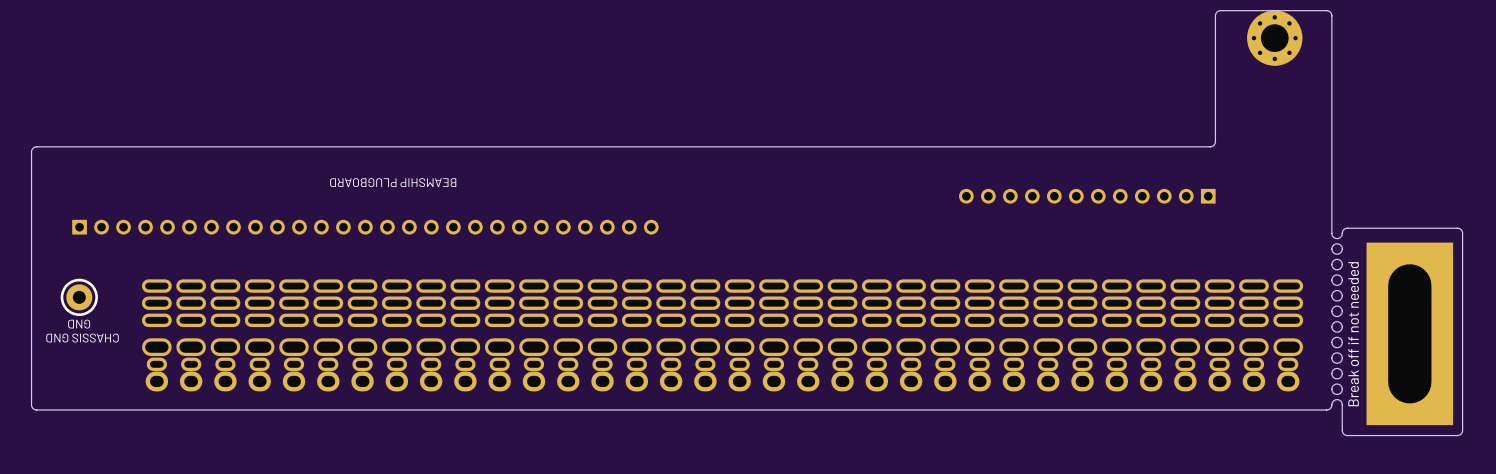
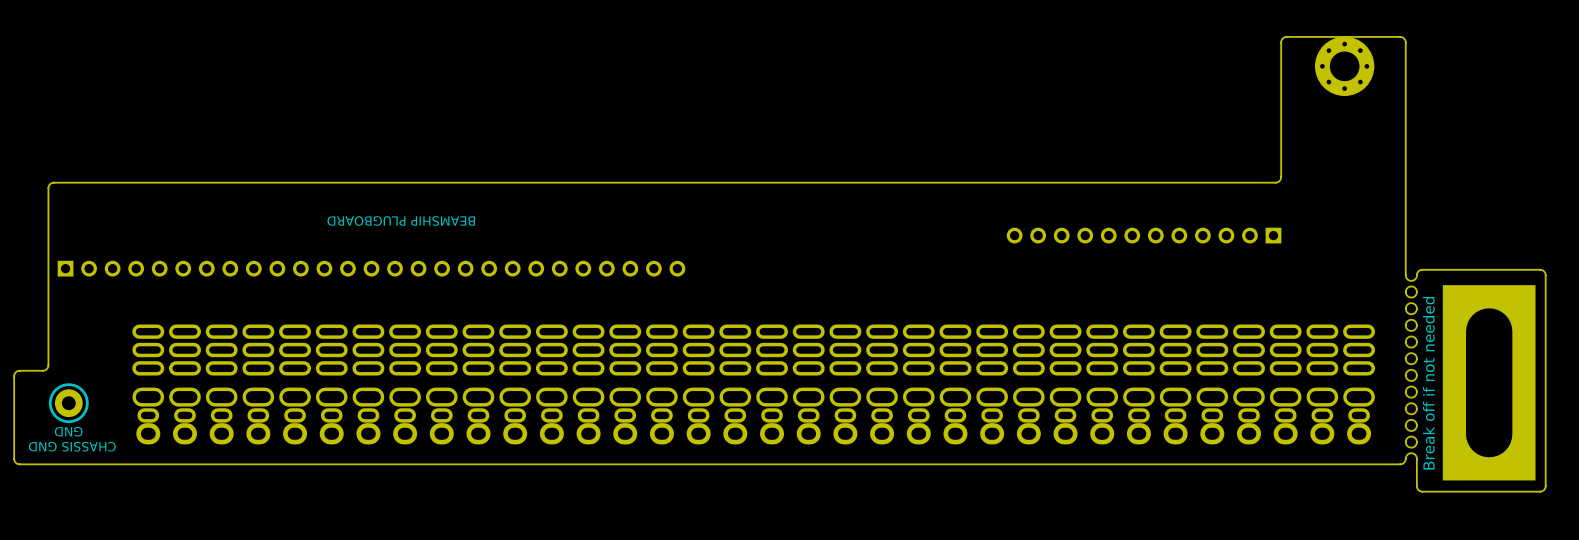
board edge: (68, 146) (36, 146) (31, 150) (31, 327) -> (53, 182) (50, 184) (48, 188) (48, 366) (43, 370) (18, 370) (14, 376)
part position: (79, 297) -> (68, 403)

